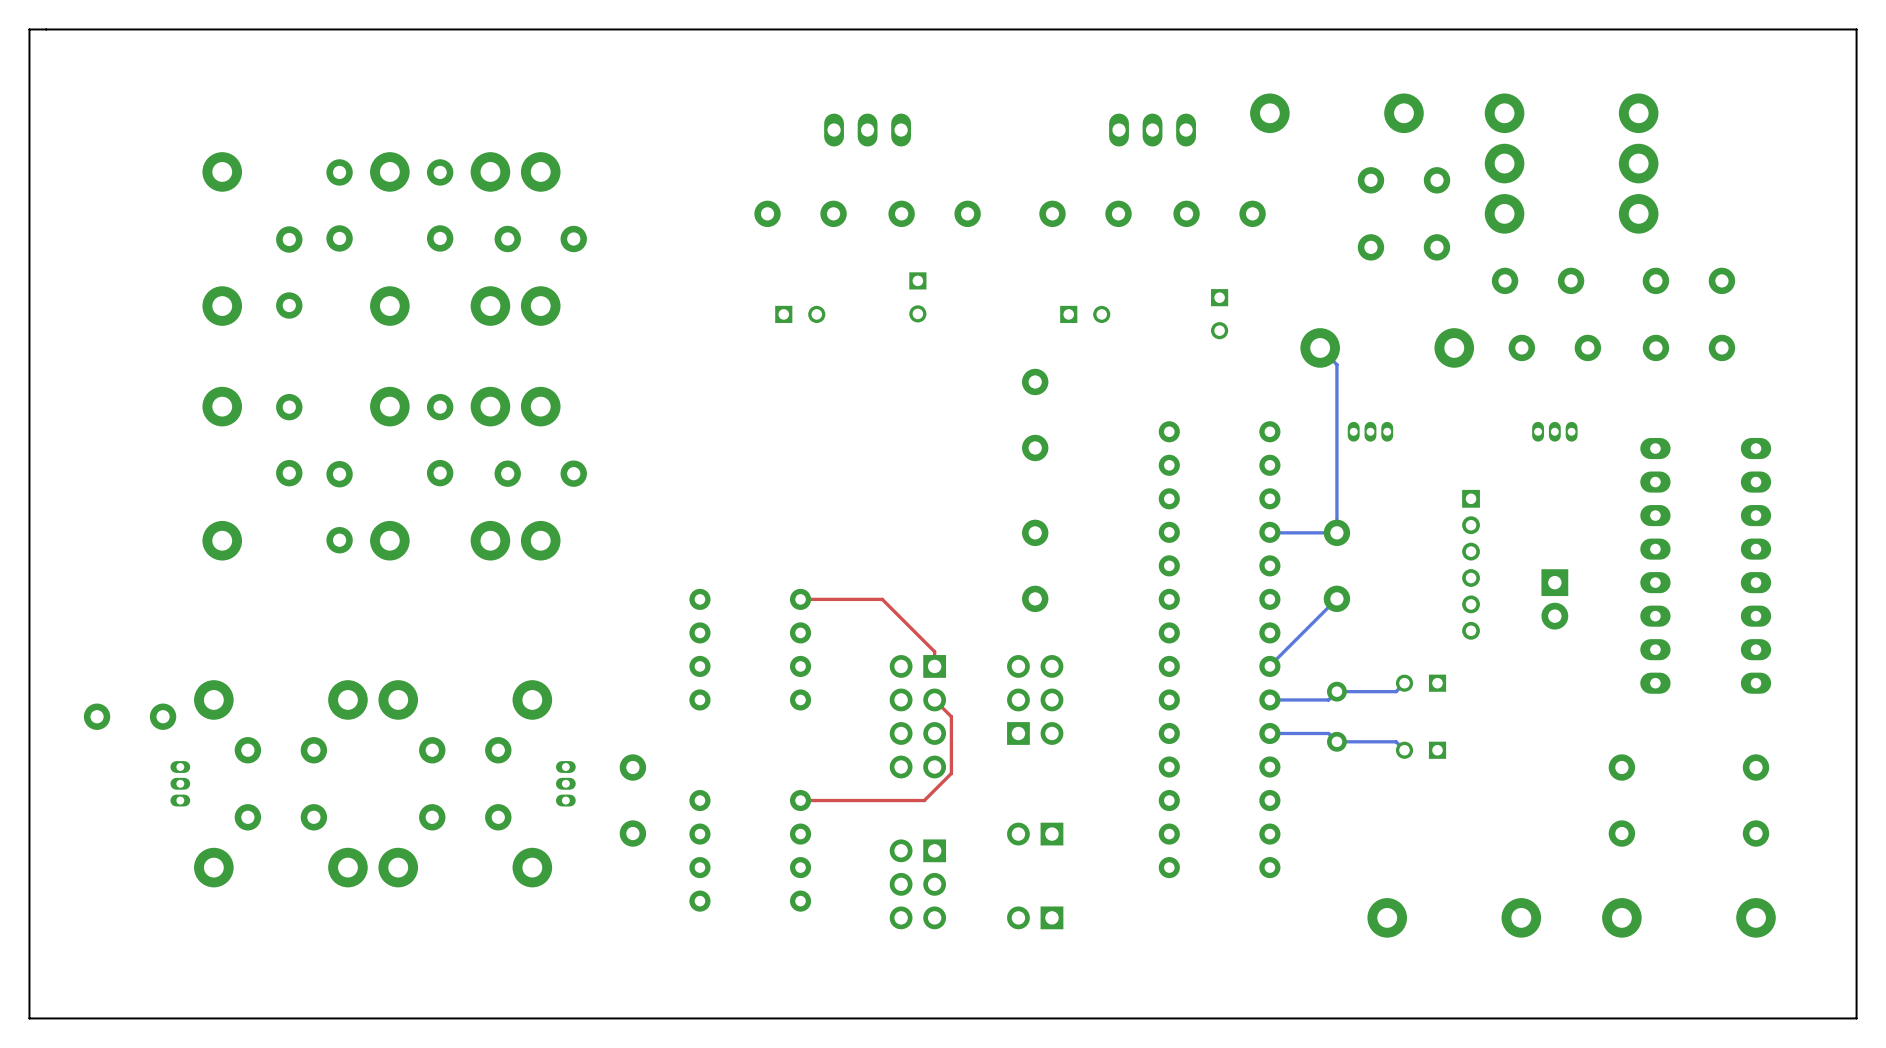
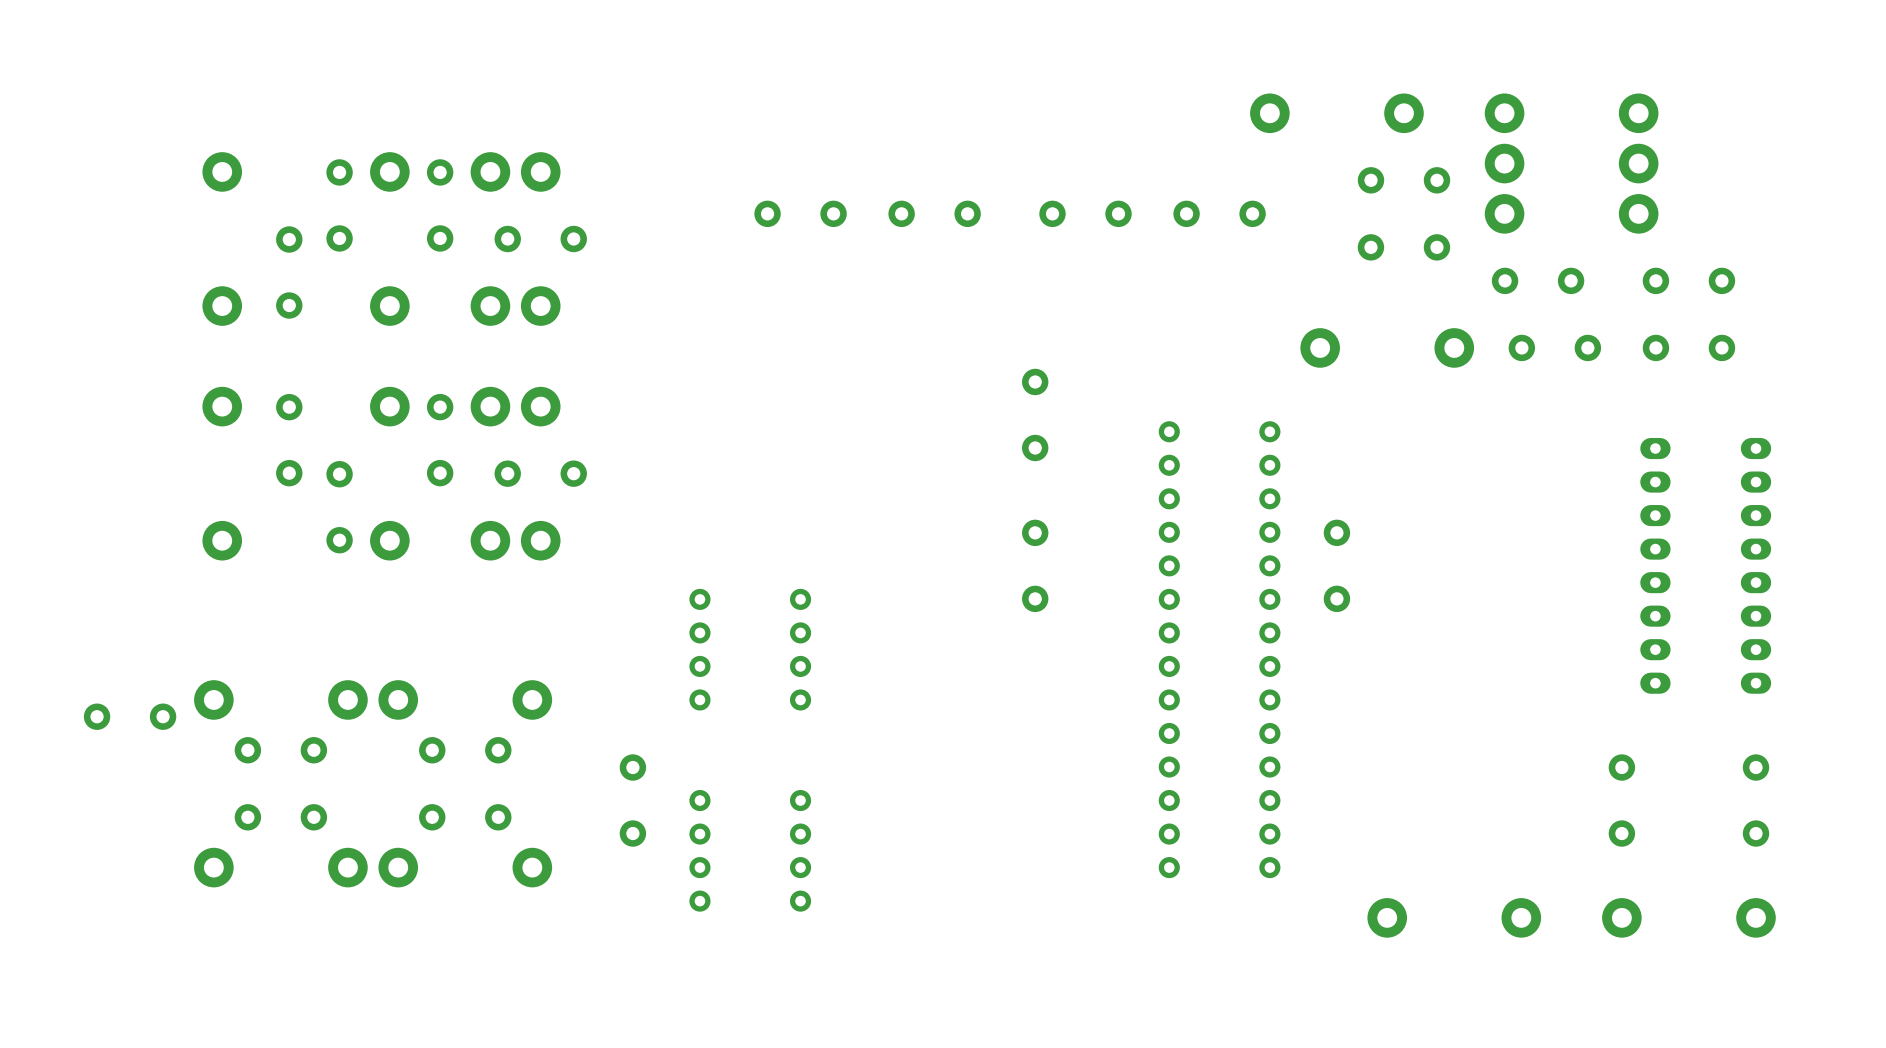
board edge: (1856, 29) (29, 29) (29, 1018) (1856, 1018) (1856, 29) -> none
part: (867, 130) -> none
part: (1152, 130) -> none
part: (917, 297) -> none
part: (800, 314) -> none
part: (1085, 314) -> none
part: (1219, 314) -> none
bottom track: (1320, 347) (1336, 364) (1336, 532) (1269, 532) -> none
part: (1370, 431) -> none
part: (1554, 431) -> none
part: (1471, 564) -> none
bottom track: (1336, 598) (1269, 666) -> none
top track: (800, 599) (882, 599) (934, 651) (934, 666) -> none
part: (1554, 599) -> none
bottom track: (1404, 683) (1396, 691) (1336, 691) (1328, 699) (1269, 699) -> none
part: (1421, 683) -> none
top track: (934, 699) (951, 716) (951, 773) (924, 800) (800, 800) -> none
part: (1035, 699) -> none
part: (917, 716) -> none
part: (1336, 716) -> none
bottom track: (1269, 733) (1328, 733) (1336, 741) (1396, 741) (1404, 750) -> none
part: (1421, 750) -> none
part: (180, 783) -> none
part: (565, 783) -> none
part: (1035, 834) -> none
part: (917, 884) -> none
part: (1035, 917) -> none

